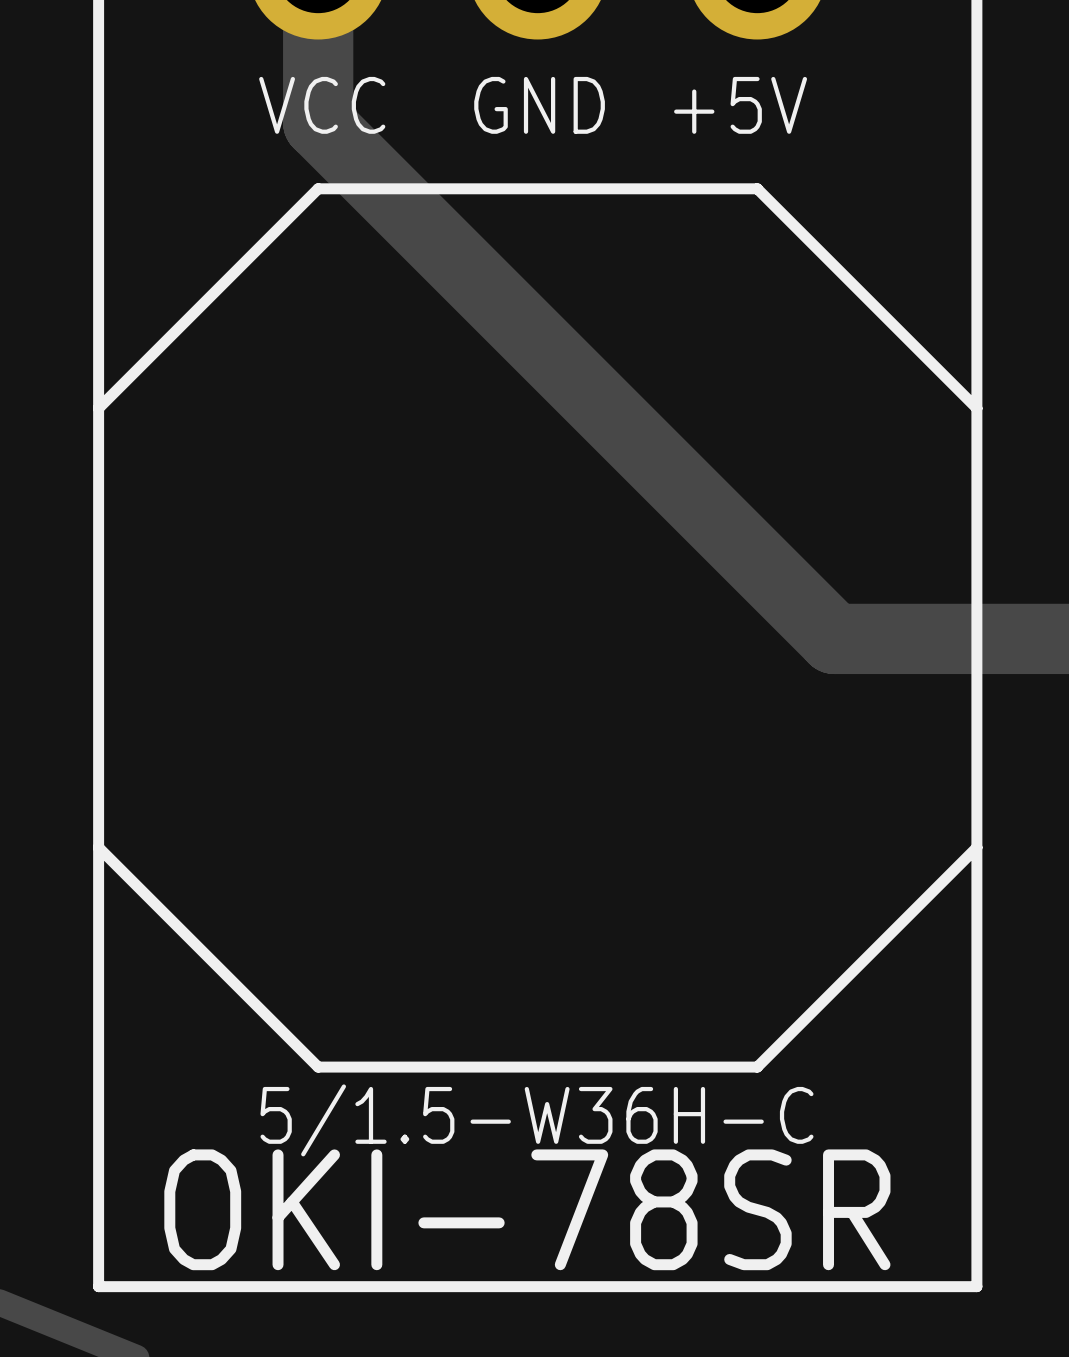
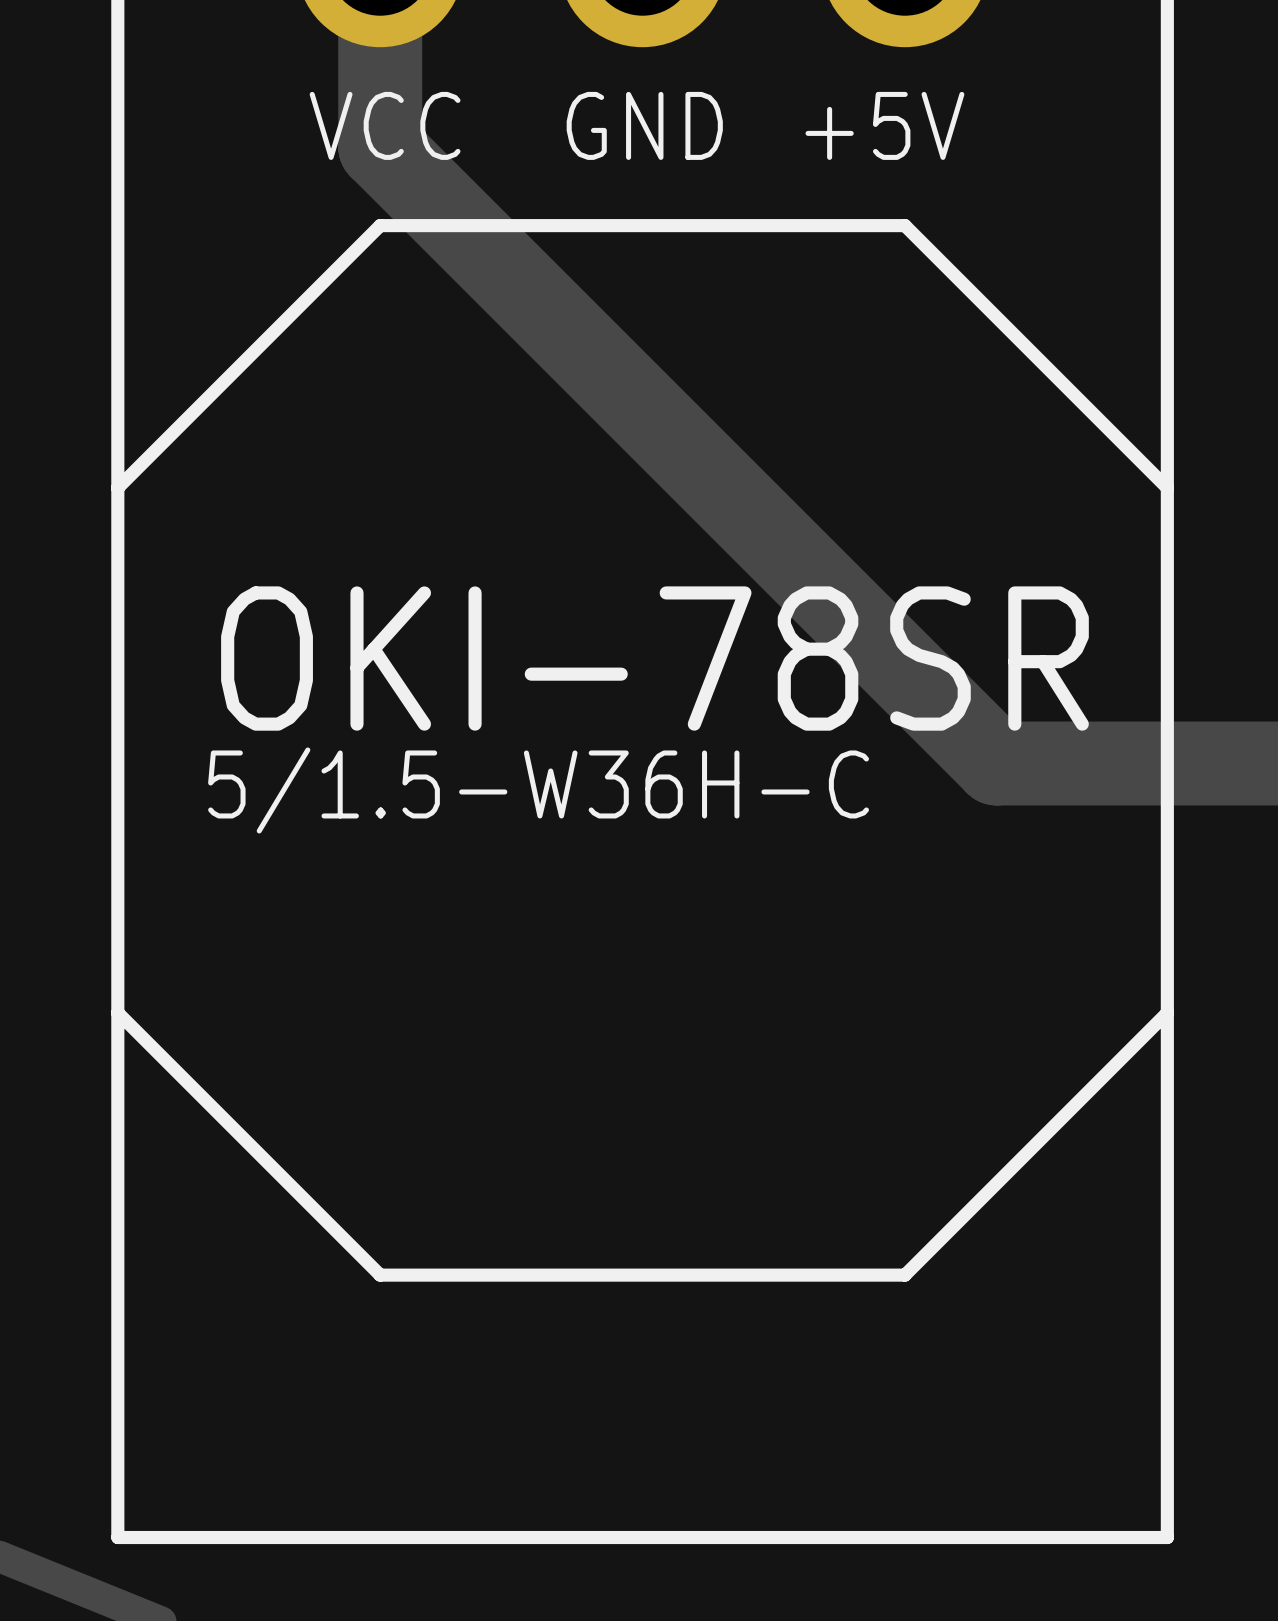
OKI-78SR value position: 5/1.5-W36H-C (536, 1120) -> 5/1.5-W36H-C (538, 790)
OKI-78SR name position: OKI-78SR (527, 1209) -> OKI-78SR (654, 658)

